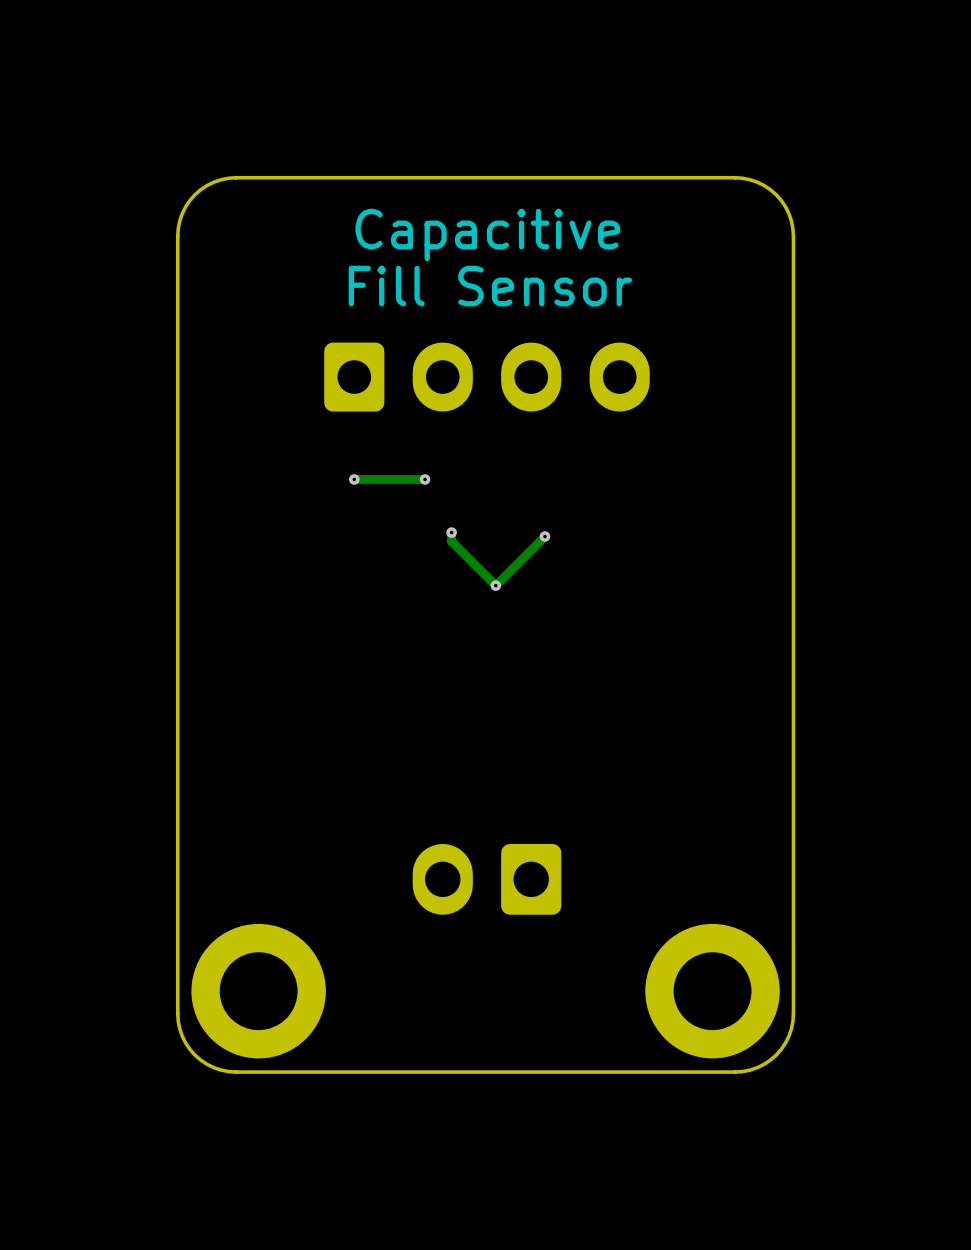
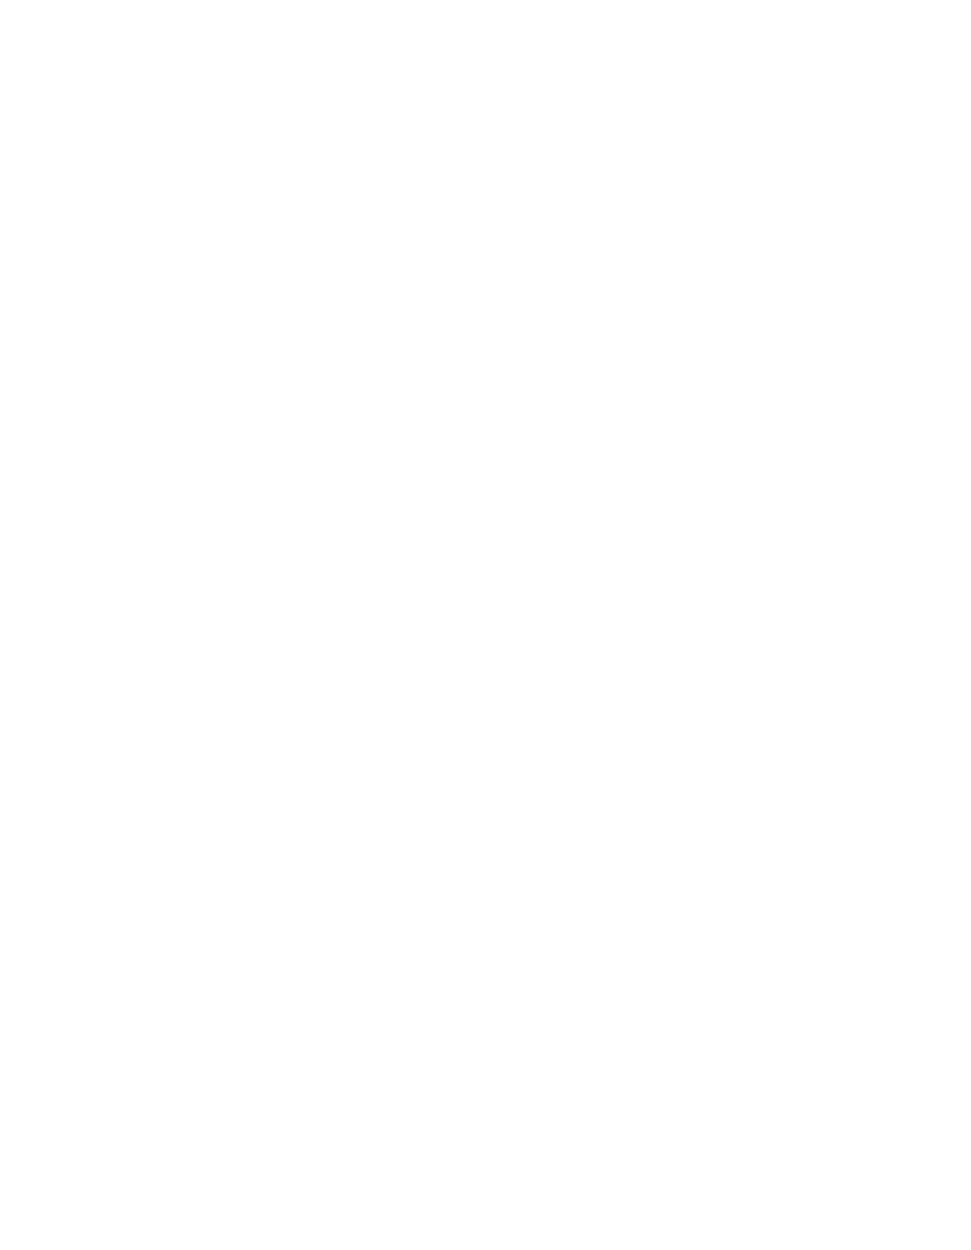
board edge: (735, 177) (236, 177) (221, 179) (206, 185) (194, 194) (185, 206) (179, 221) (177, 236) (177, 1013) (179, 1028) (185, 1042) (194, 1054) (206, 1064) (221, 1070) (236, 1072) (735, 1072) (750, 1070) (764, 1064) (776, 1054) (785, 1042) (791, 1028) (793, 1013) (793, 236) (788, 213) (776, 194) (757, 182) (735, 177) -> none
text: Capacitive (487, 234) -> none
text: Fill Sensor (490, 286) -> none
part: (486, 377) -> none
via: (354, 479) -> none
track: (425, 479) (354, 479) -> none
via: (425, 479) -> none
track: (451, 532) (451, 541) (495, 585) (544, 536) -> none
via: (451, 532) -> none
via: (544, 536) -> none
via: (495, 585) -> none
part: (486, 879) -> none
part: (258, 991) -> none
part: (712, 991) -> none

